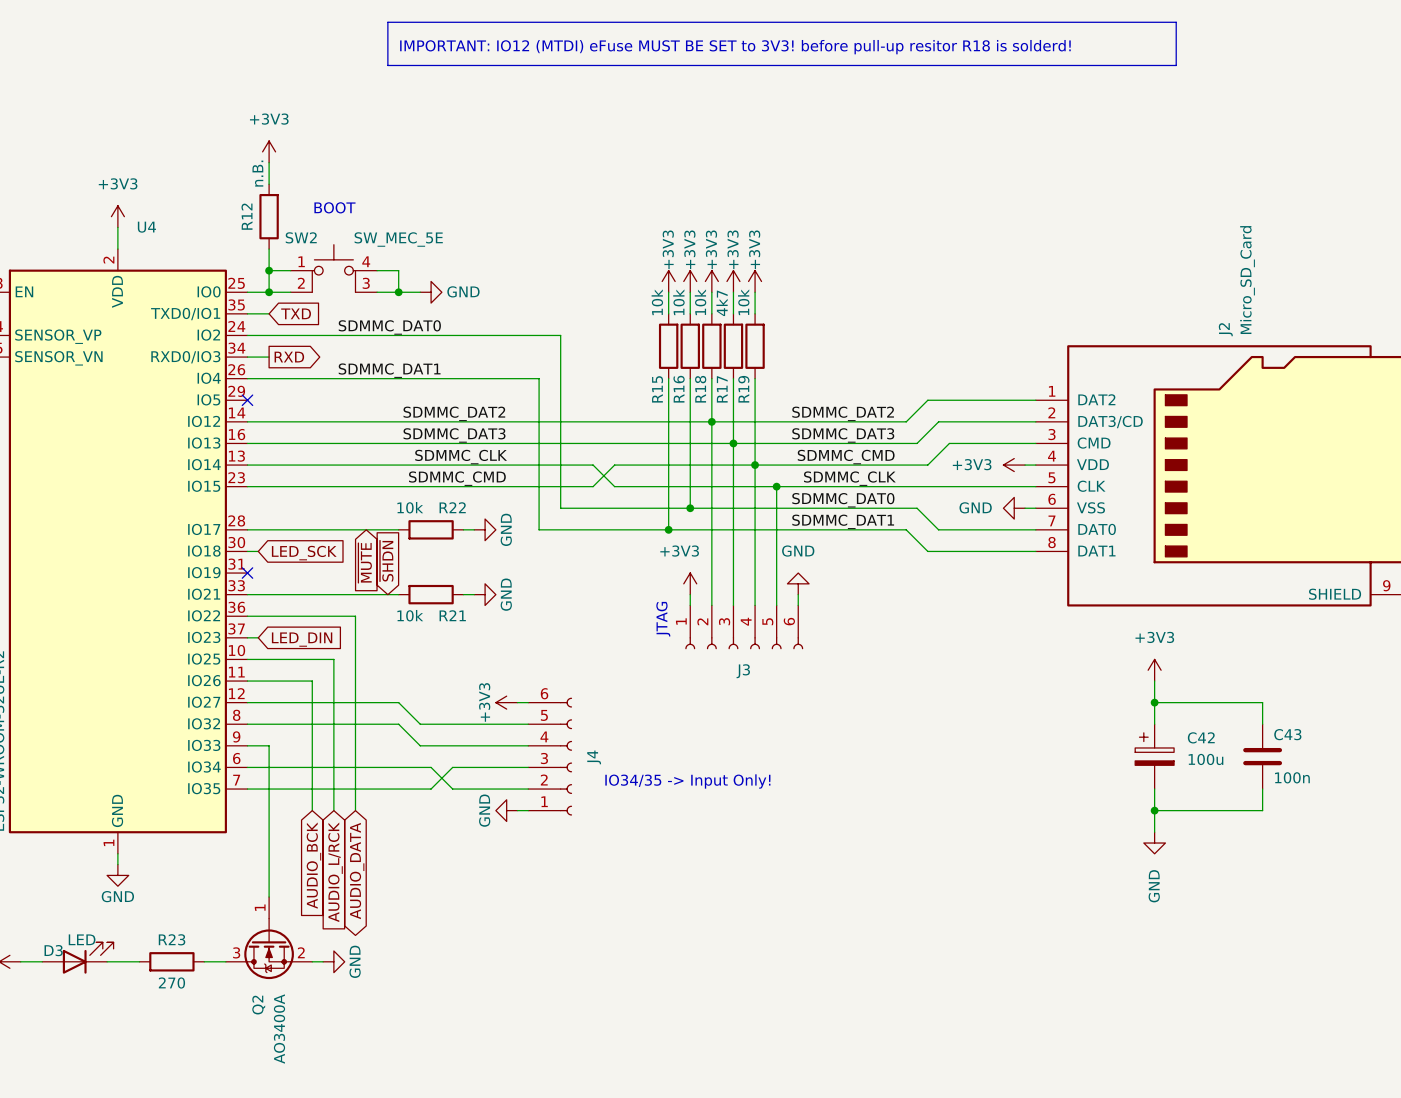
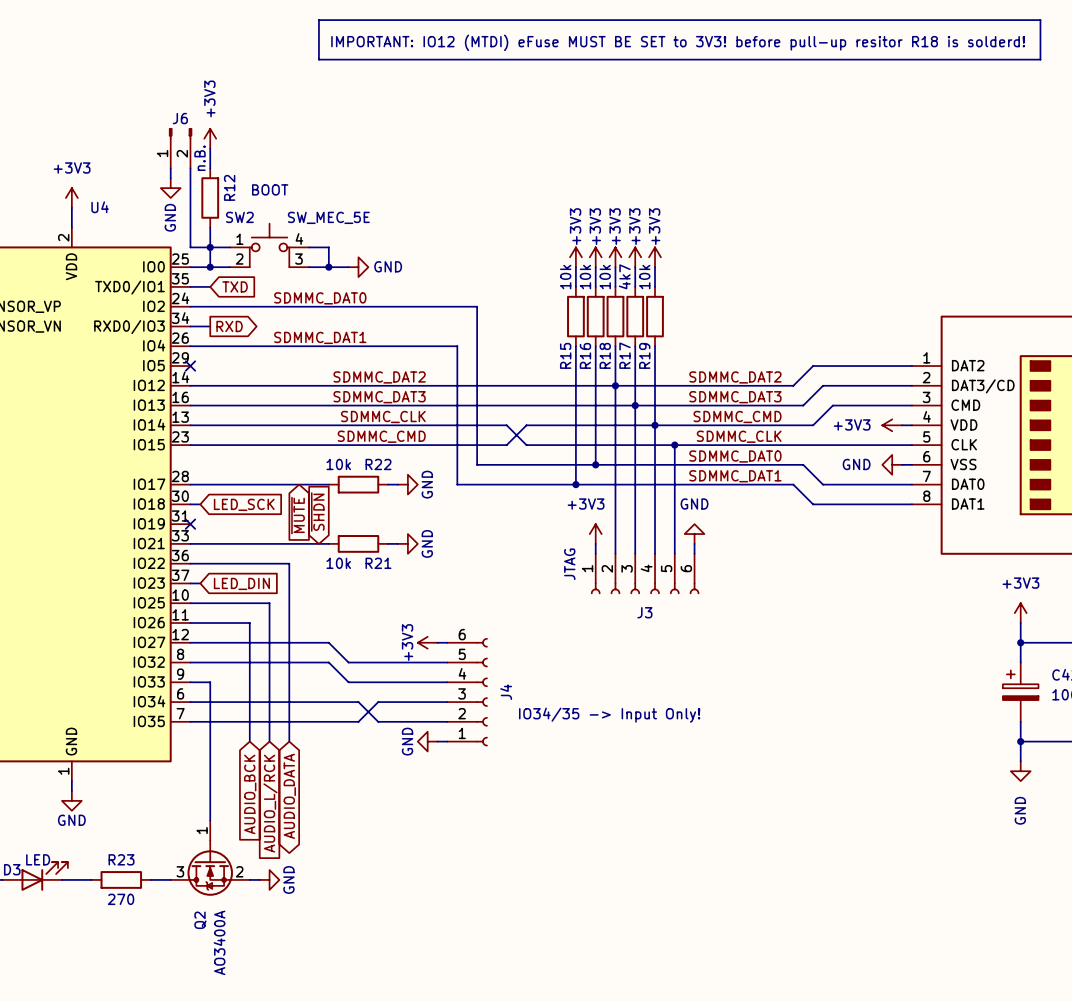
power symbol text rotation: 0° (269, 119) -> 90° counterclockwise (209, 98)
J6: none -> (180, 148)
wire: none -> (170, 168) (170, 178)
wire: none -> (190, 168) (190, 247) (210, 247)
power symbol: none -> GND (170, 188)
R12 name position: R12 (246, 216) -> R12 (229, 187)

